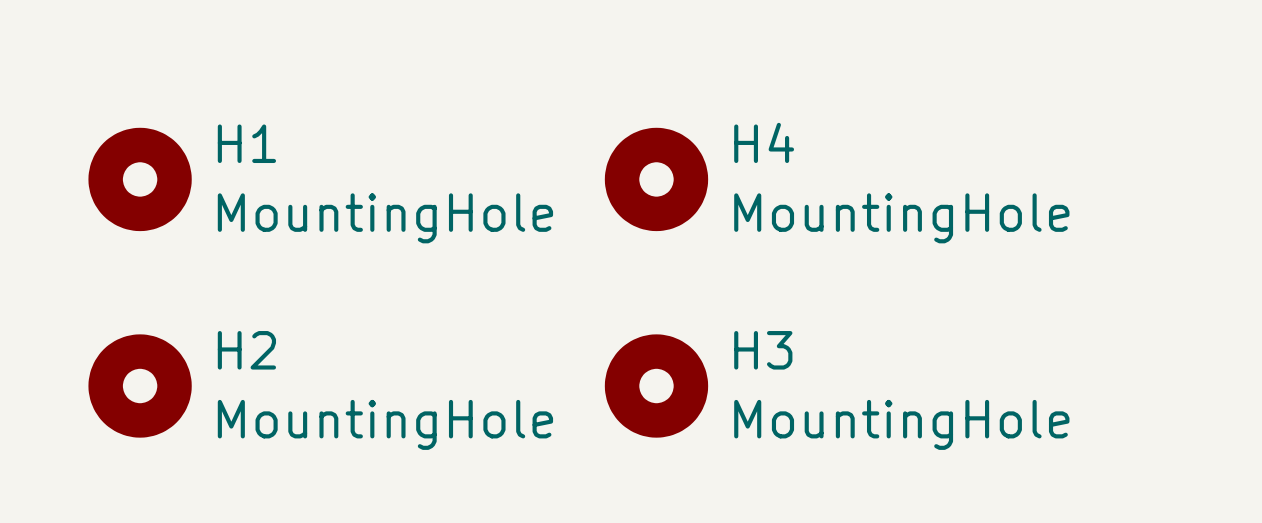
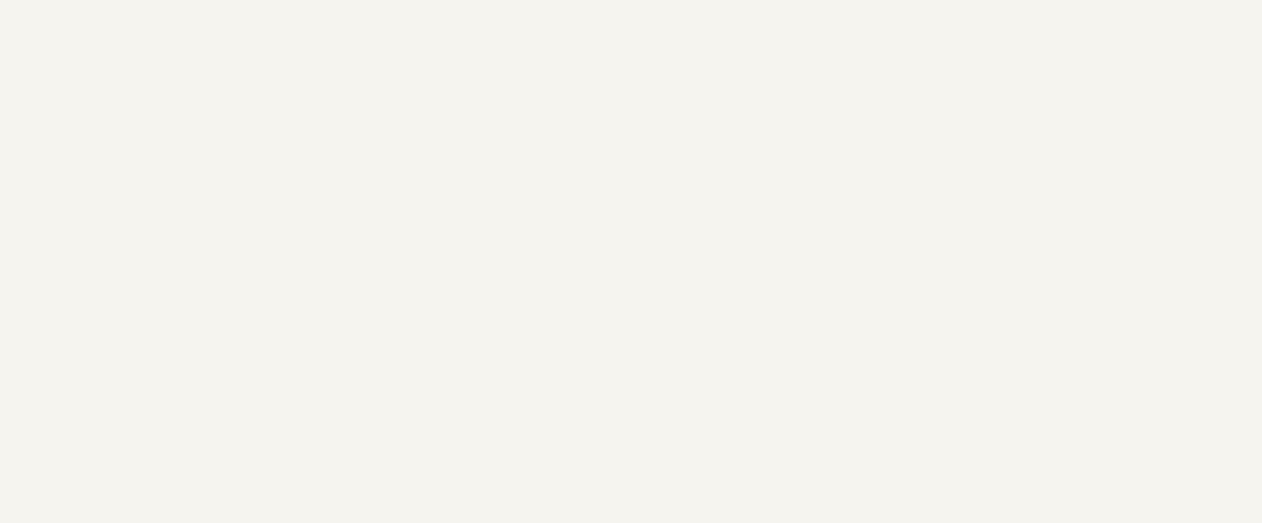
H1: MountingHole (140, 179) -> none
H4: MountingHole (656, 179) -> none
H2: MountingHole (140, 386) -> none
H3: MountingHole (656, 386) -> none

